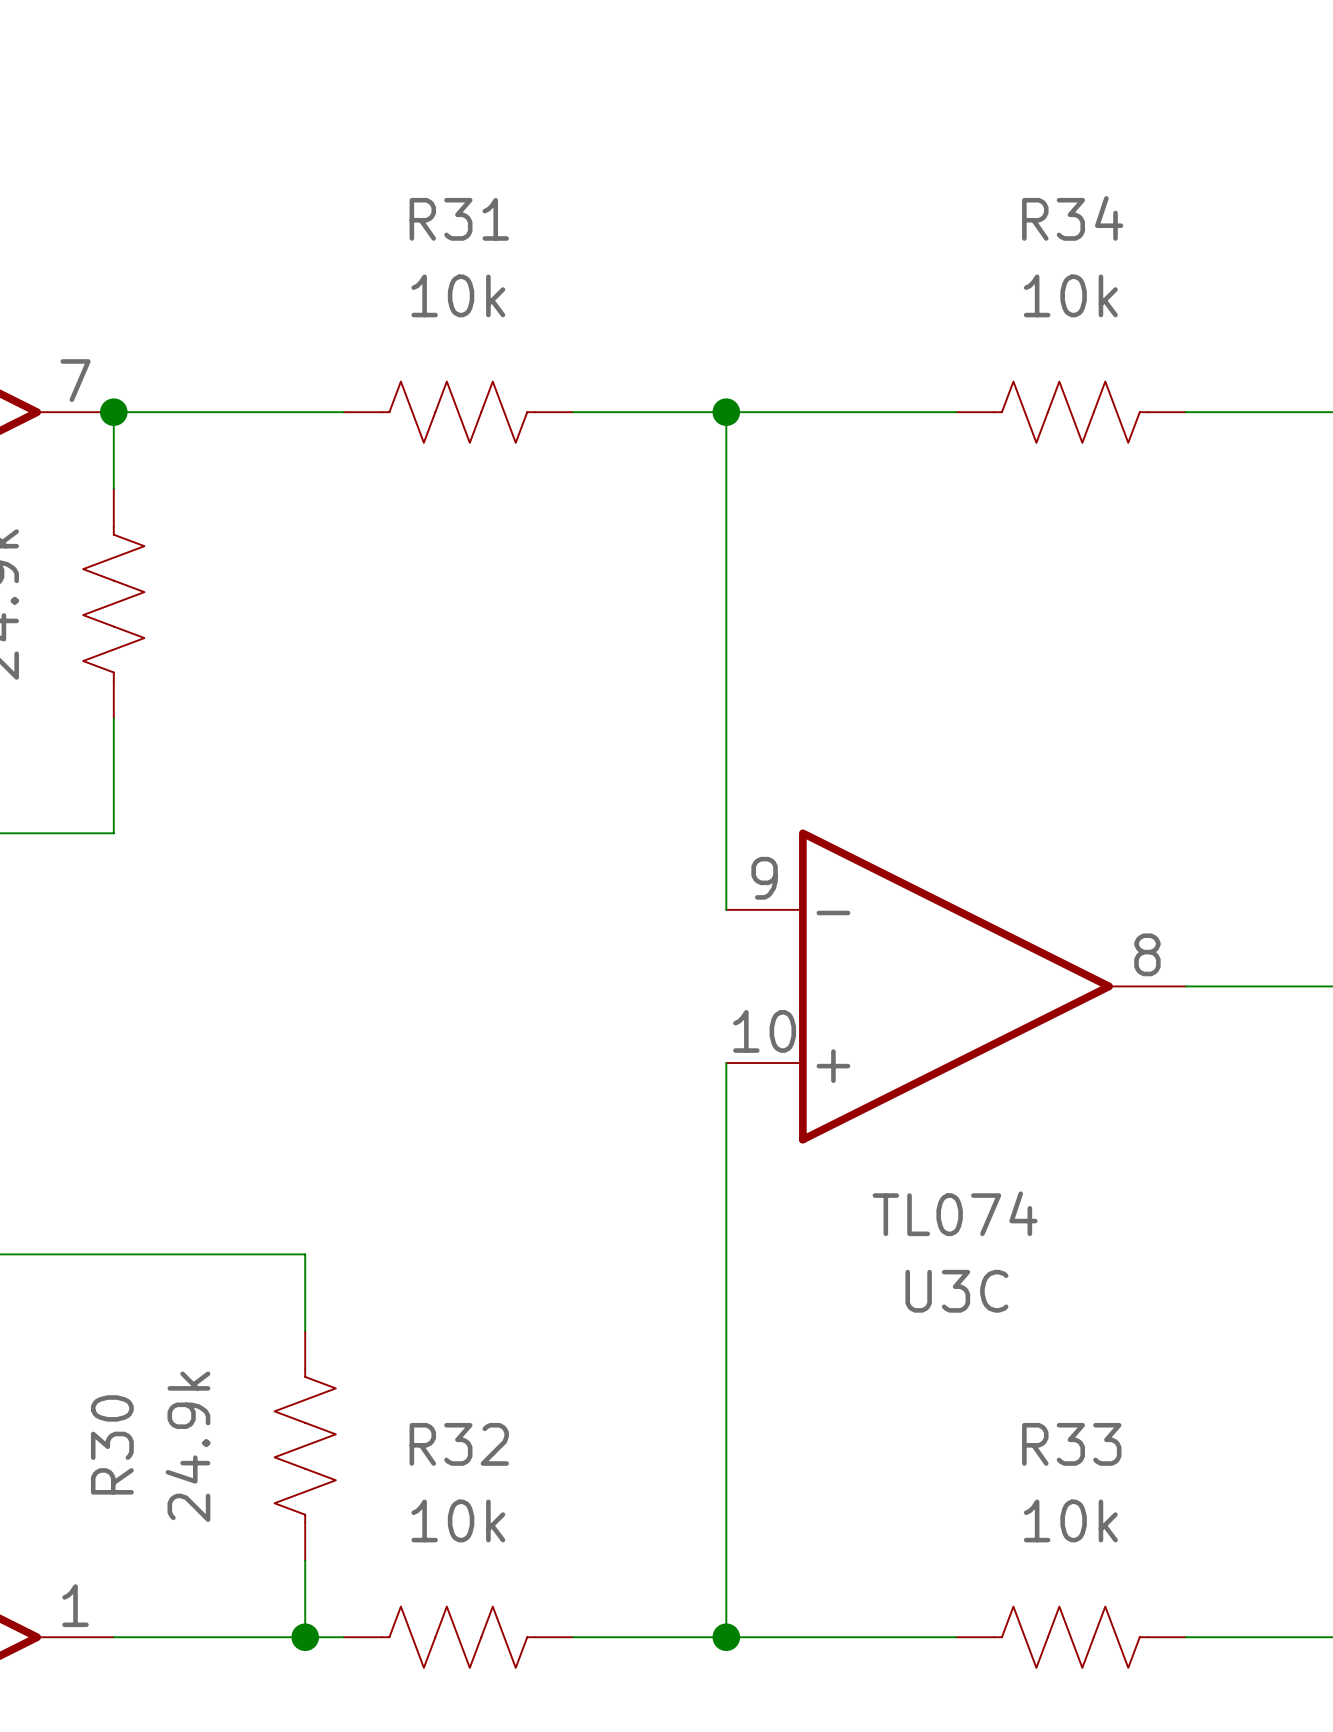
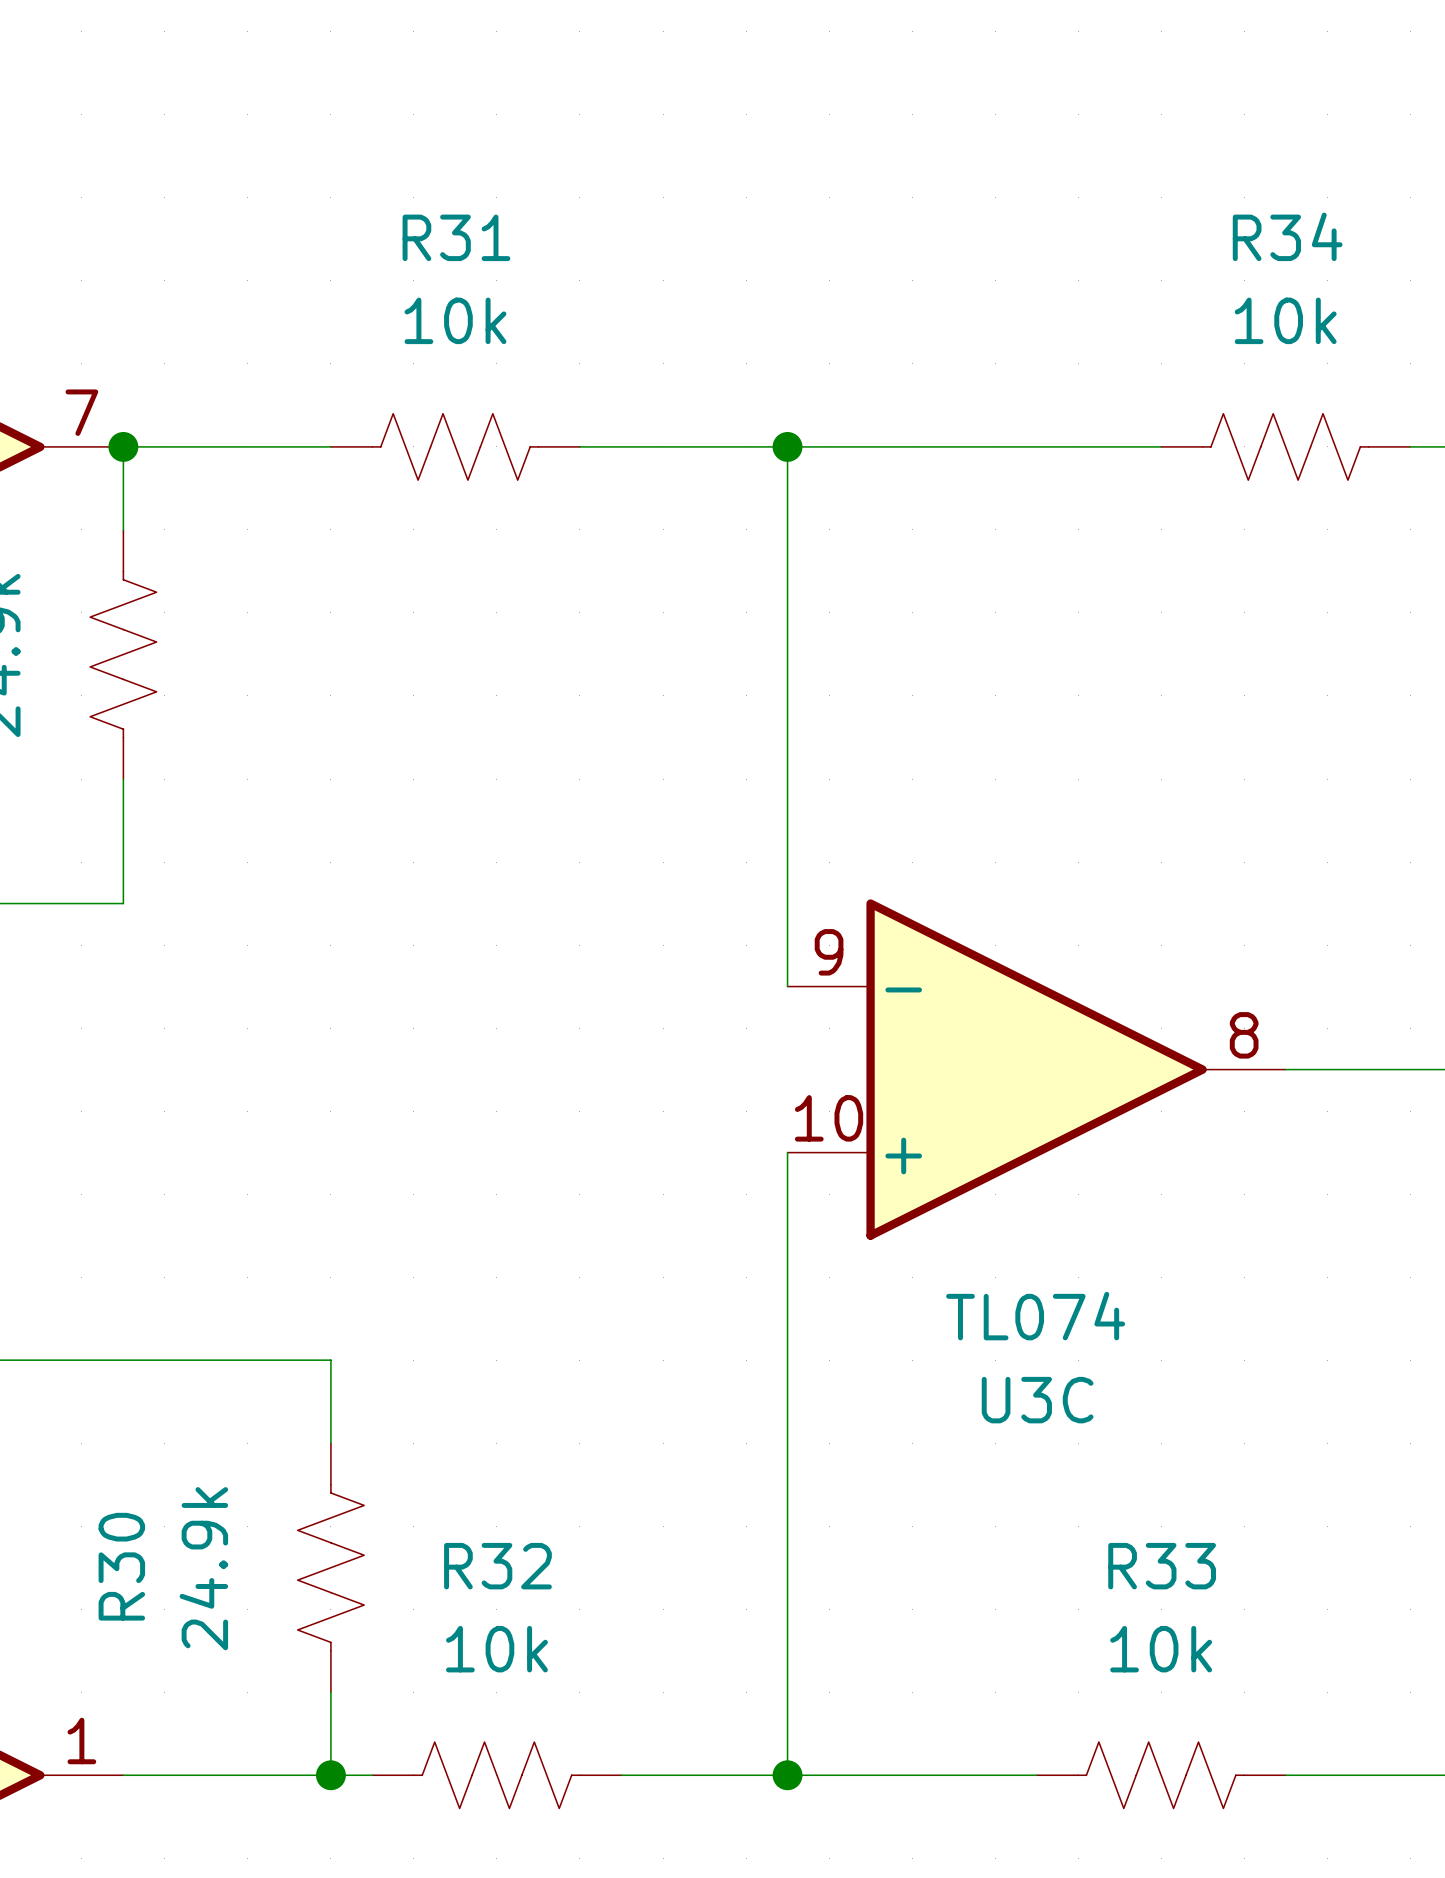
R31 position: (458, 412) -> (455, 446)
R34 position: (1070, 412) -> (1285, 446)
wire: (1185, 412) (1300, 412) -> (1036, 446) (1161, 446)

